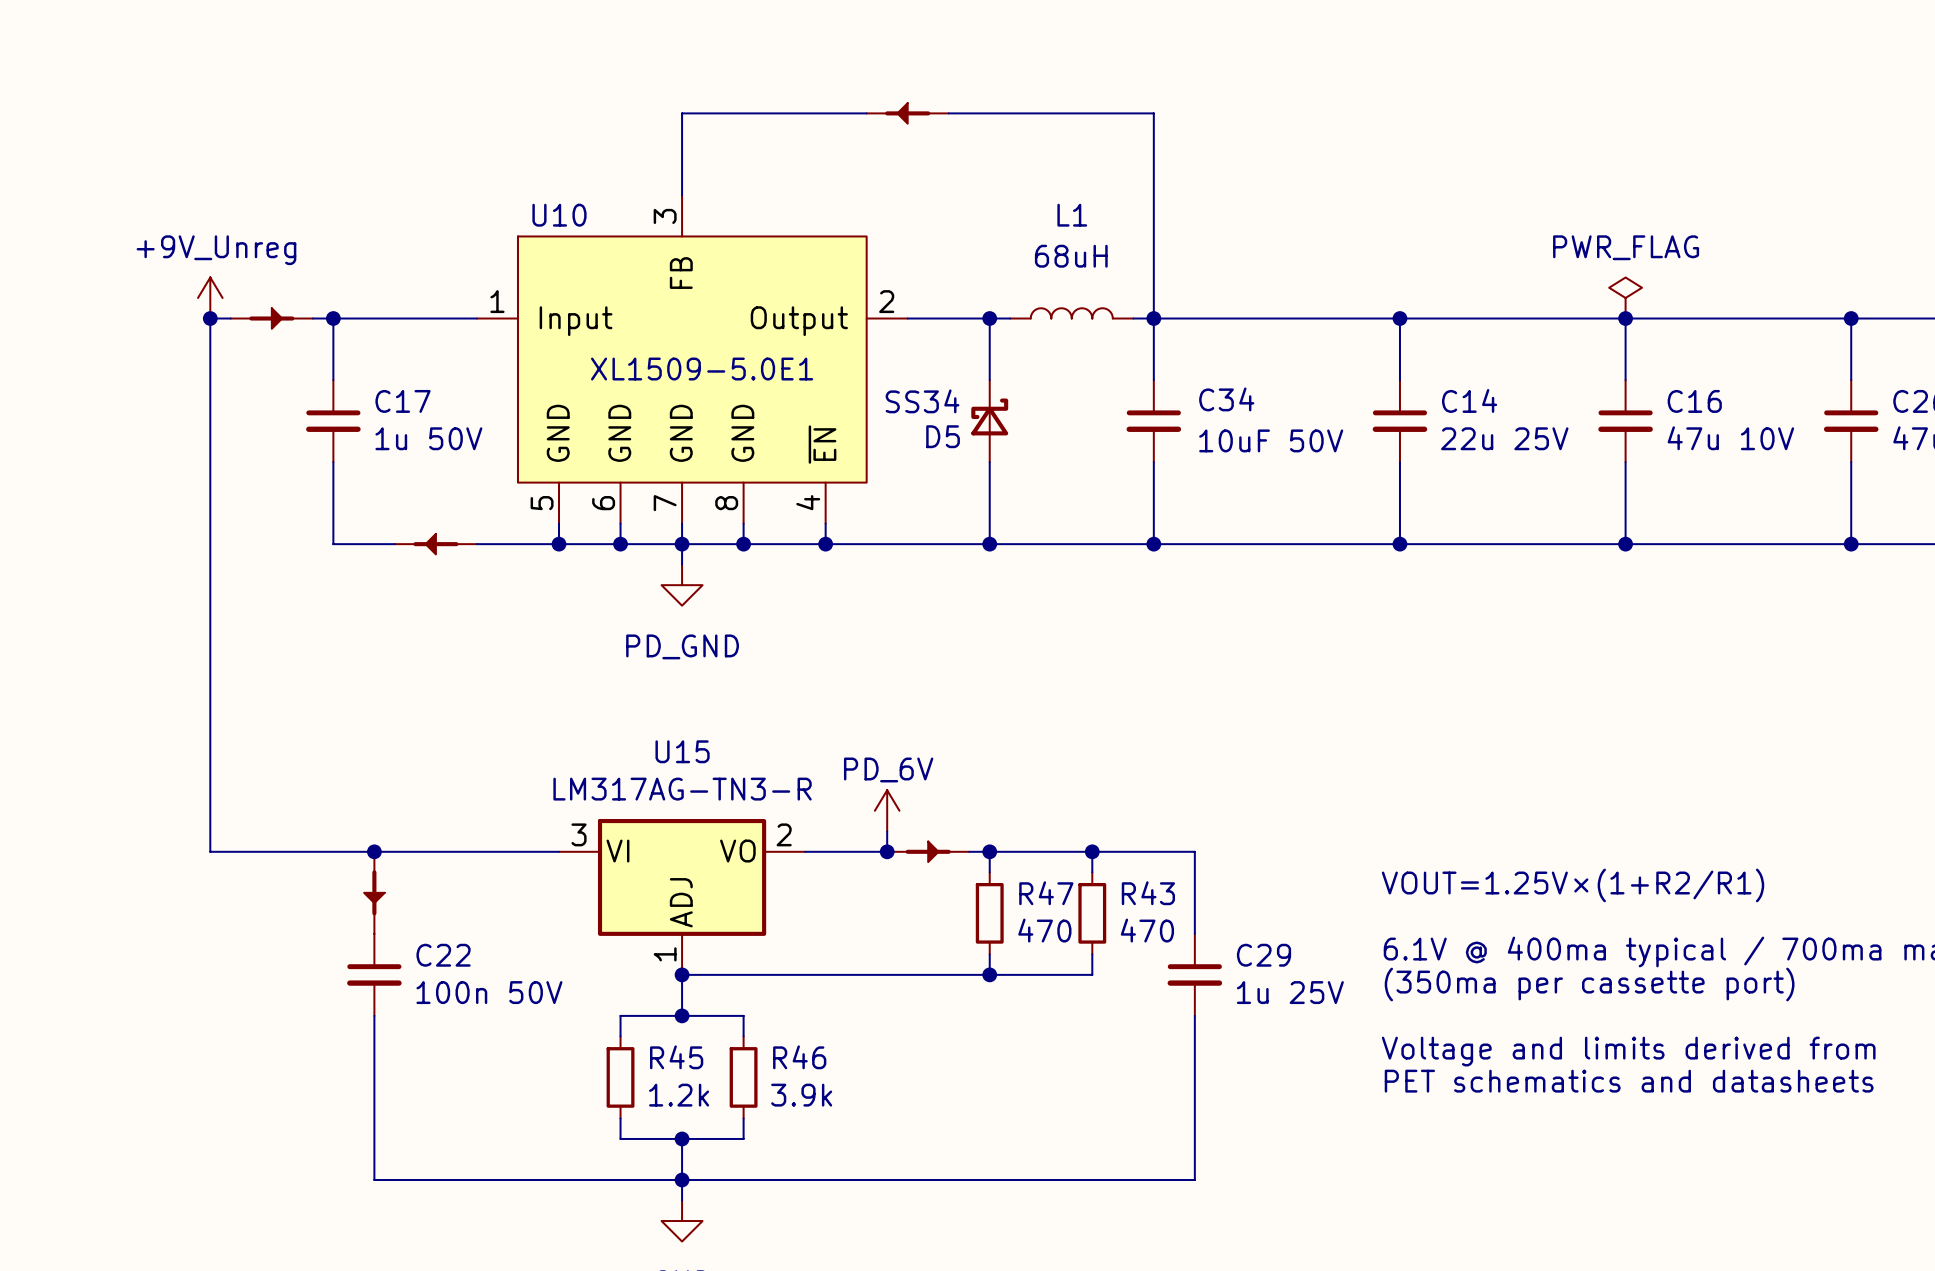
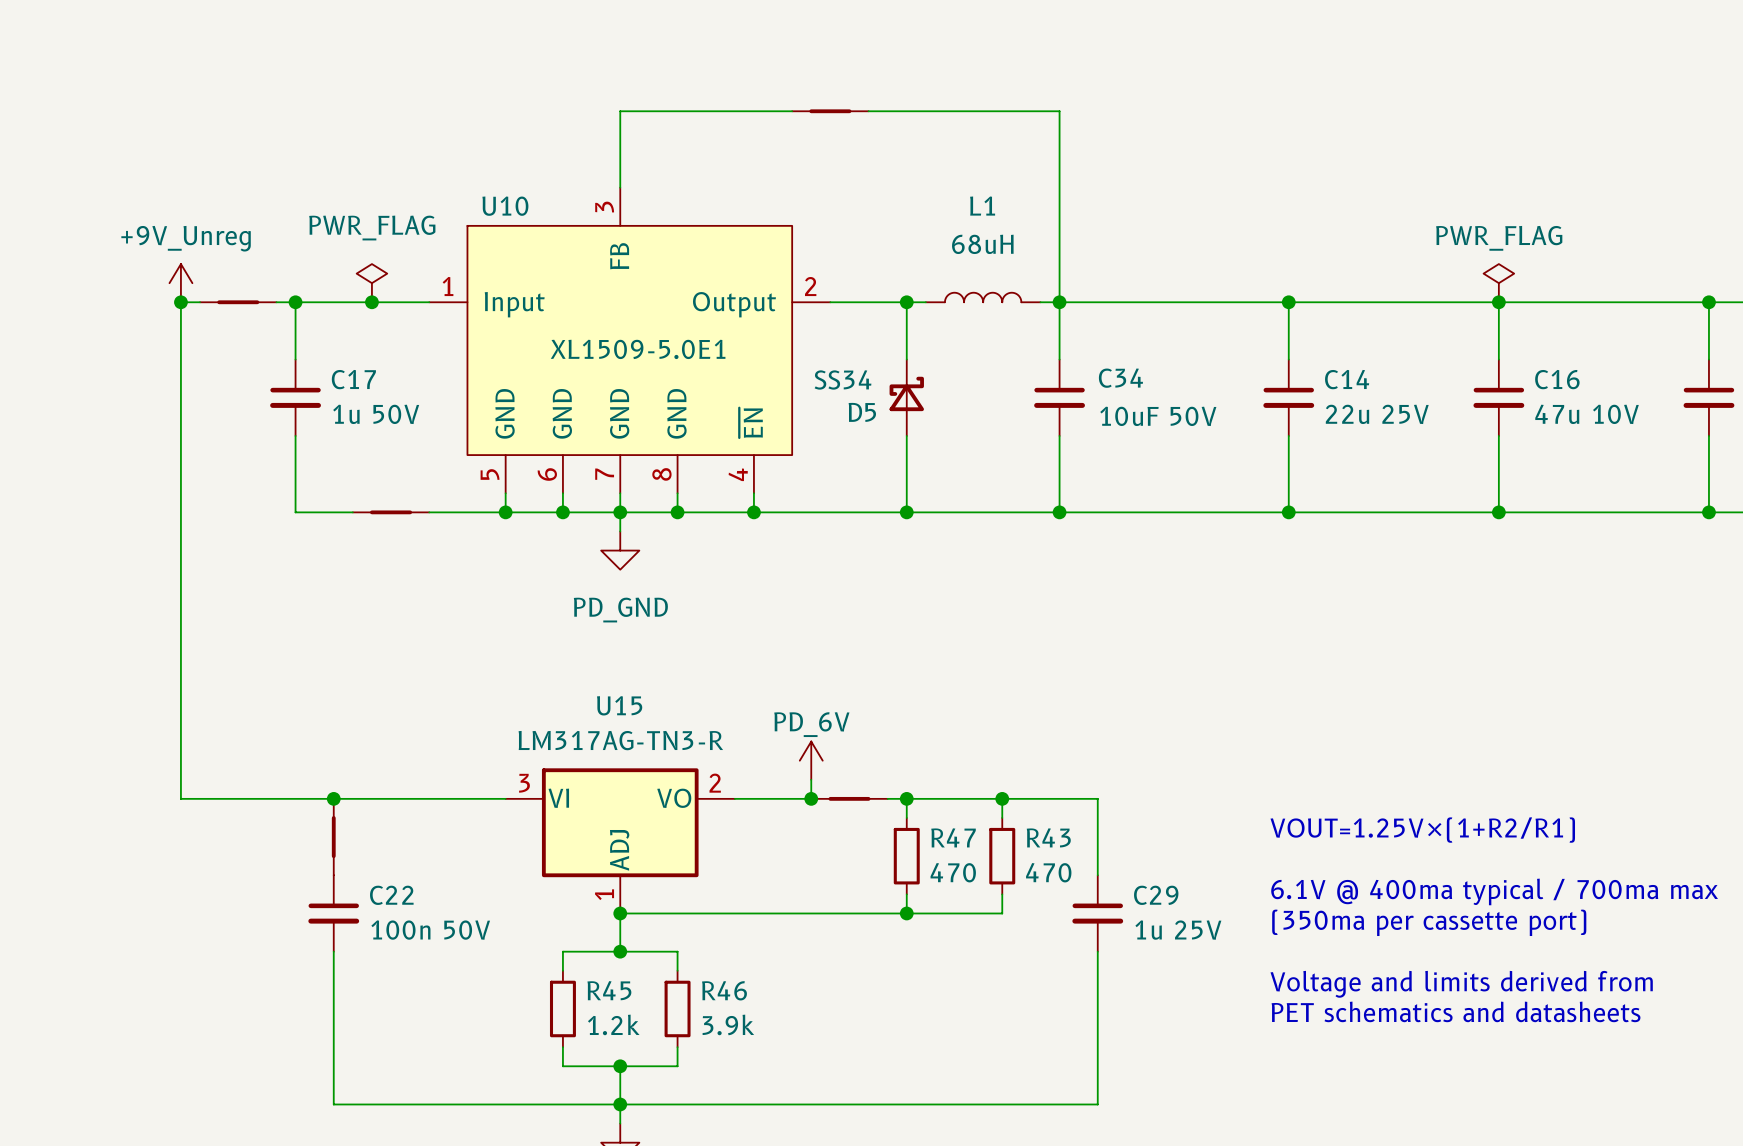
part symbol: [866, 103, 949, 124] -> [792, 109, 869, 114]
power symbol: none -> PWR_FLAG (371, 283)
part symbol: [230, 308, 313, 329] -> [200, 300, 277, 305]
junction: none -> (371, 302)
part symbol: [394, 533, 477, 555] -> [352, 510, 430, 515]
part symbol: [887, 841, 970, 863] -> [811, 796, 888, 801]
part symbol: [364, 851, 385, 934] -> [331, 798, 336, 876]

